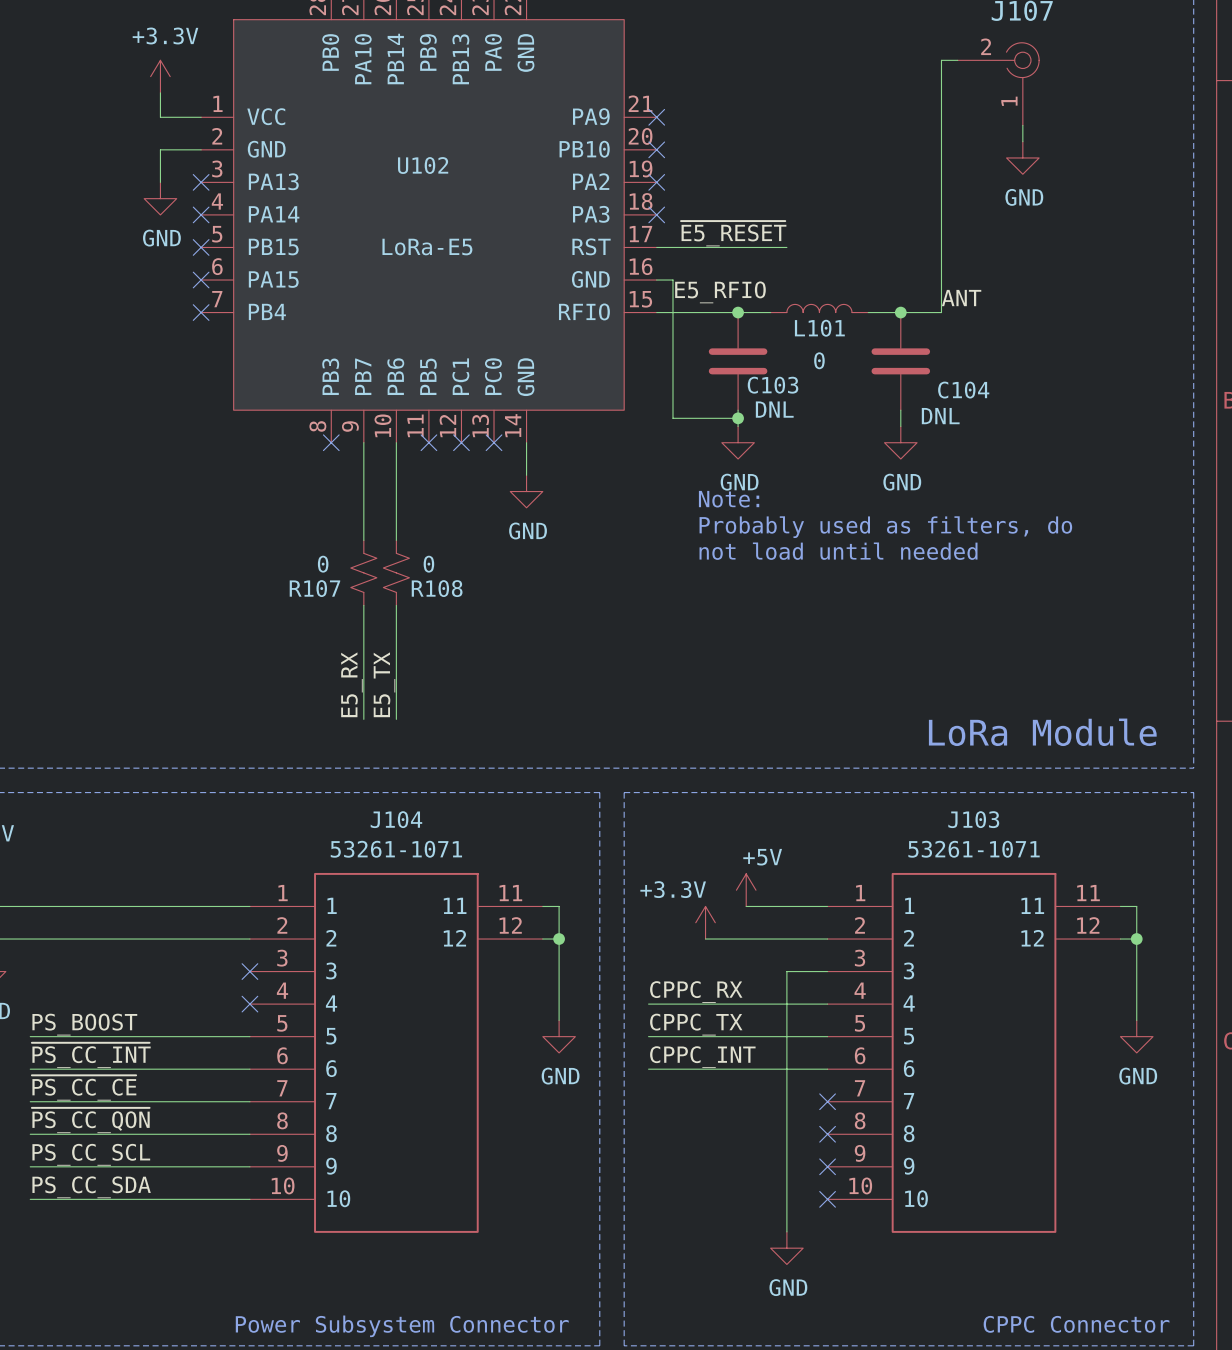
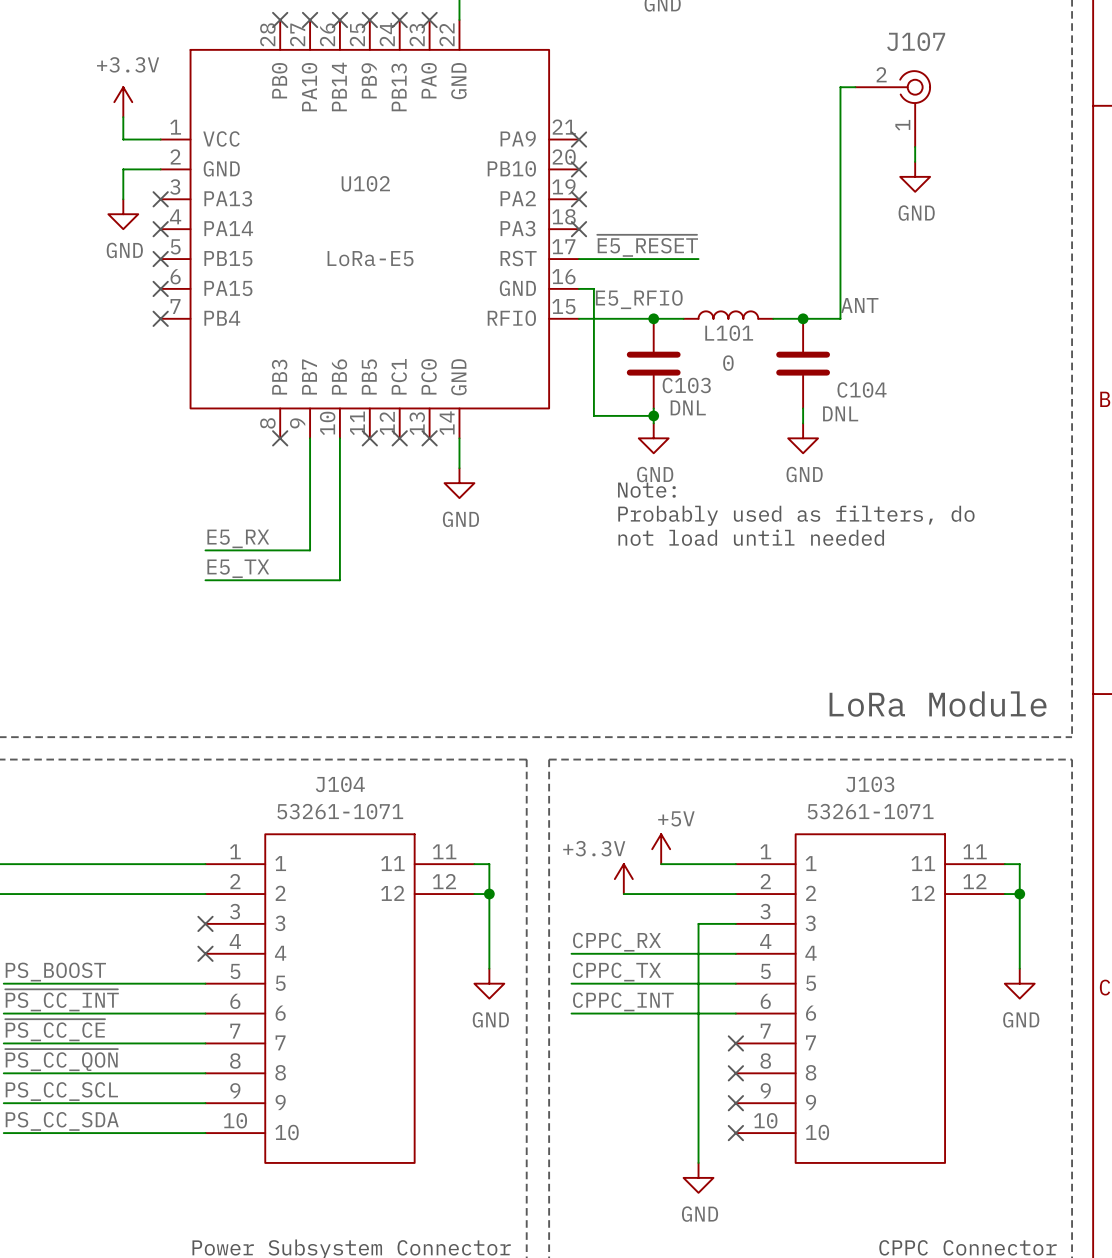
wire: none -> (310, 527) (310, 550) (205, 550)
wire: none -> (339, 527) (339, 580) (205, 580)
R107: 0 (363, 572) -> none
R108: 0 (396, 572) -> none
wire: (363, 605) (363, 719) -> none
wire: (396, 605) (396, 719) -> none
label rotation: 0° (351, 684) -> 90° clockwise (238, 538)
label position: E5_RX (351, 684) -> E5_RX (238, 538)
label rotation: 0° (384, 684) -> 90° clockwise (238, 568)
label position: E5_TX (384, 684) -> E5_TX (238, 568)

